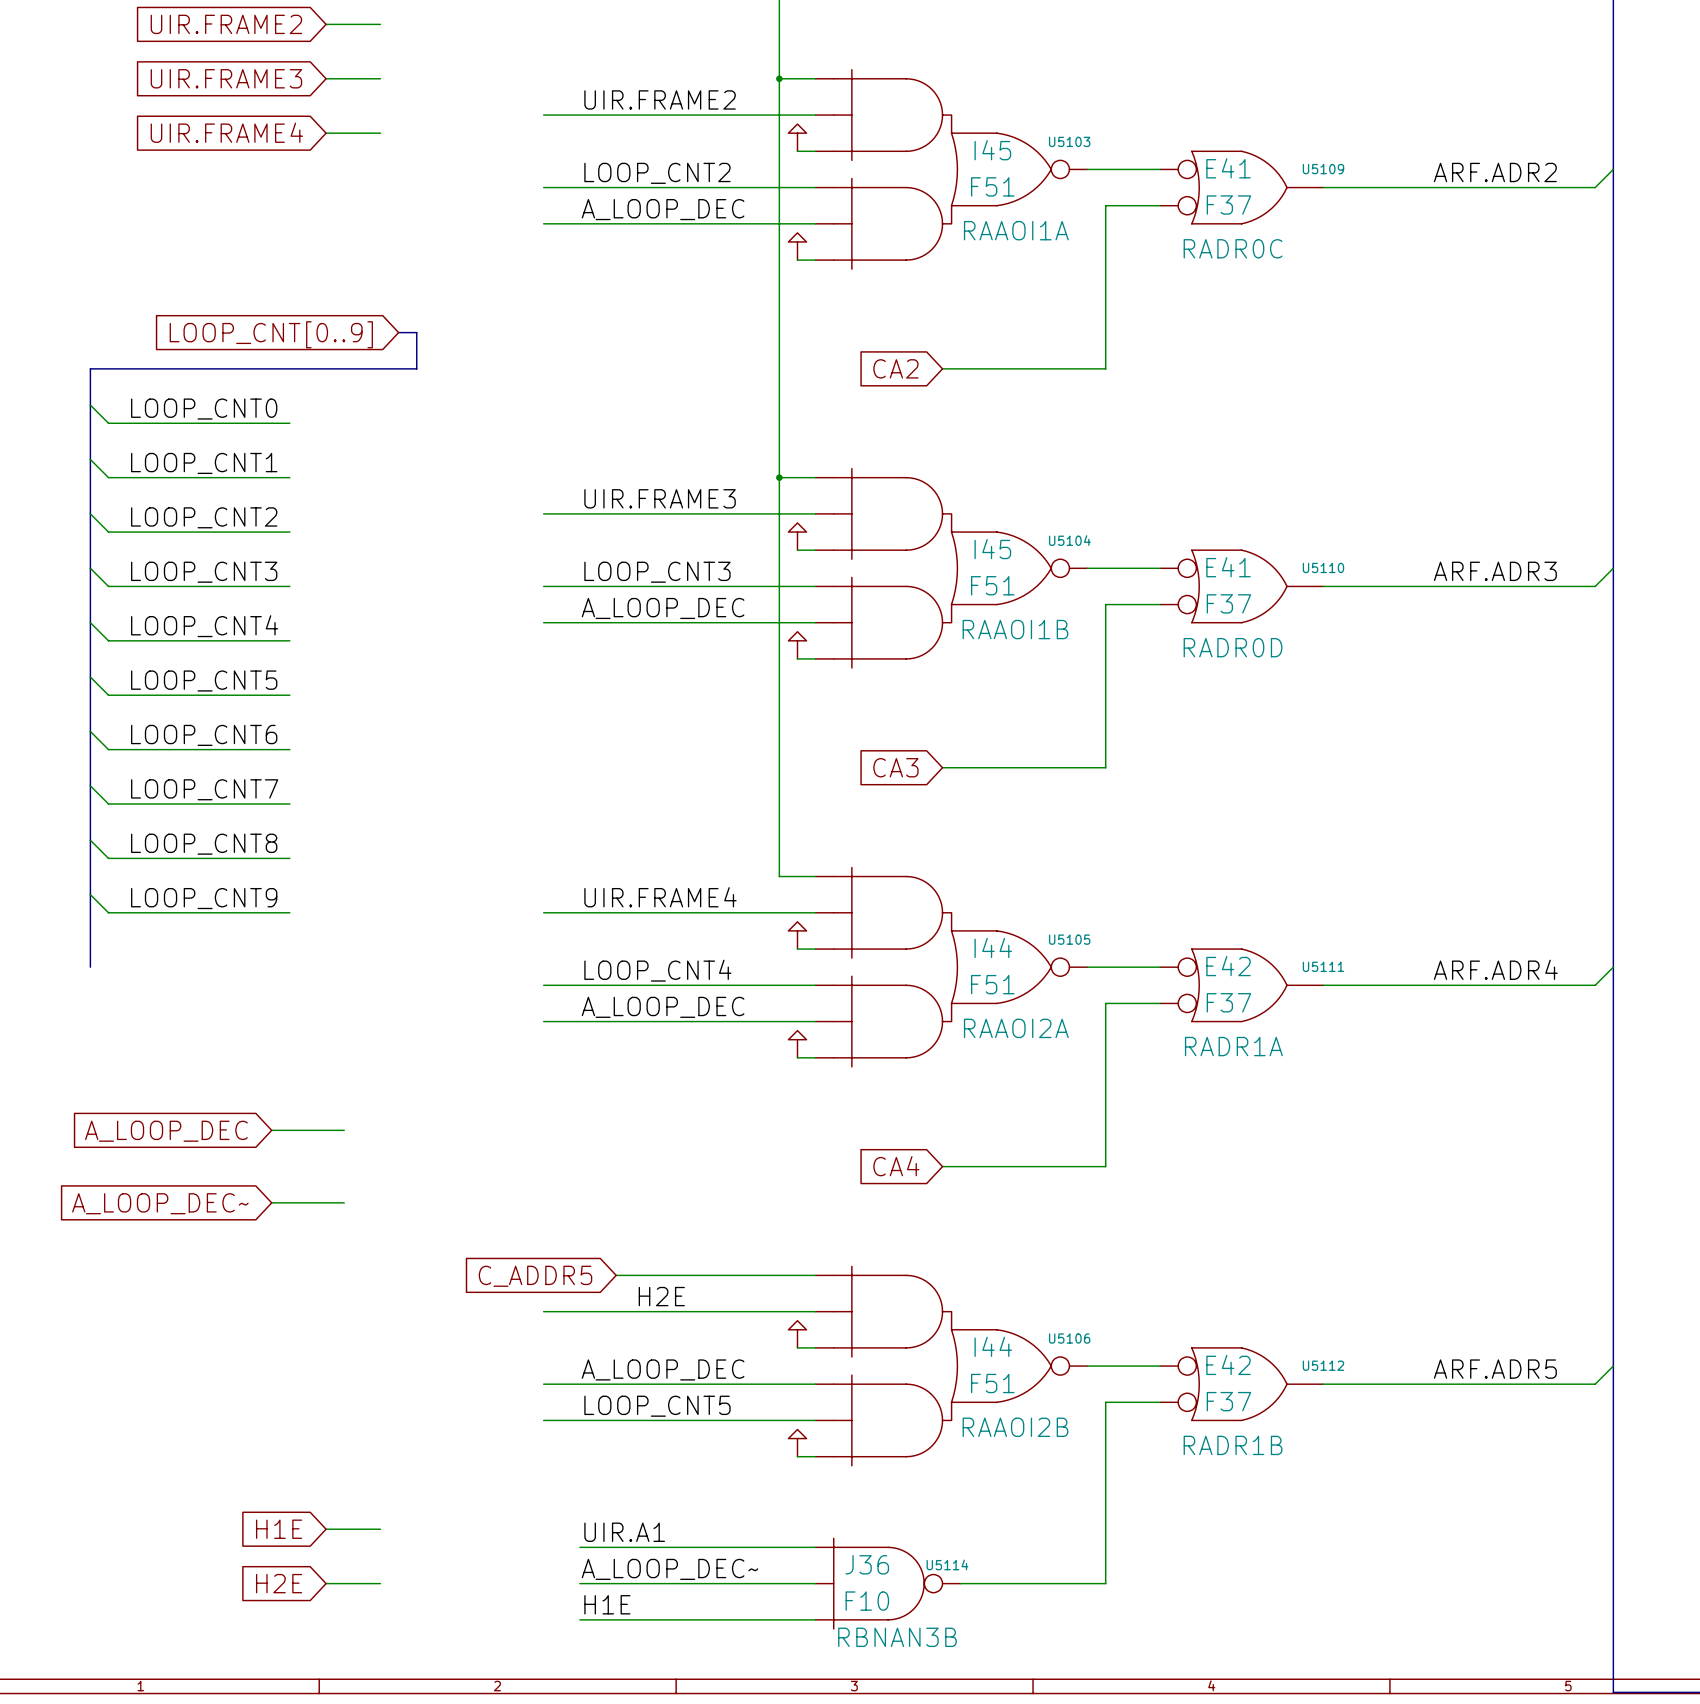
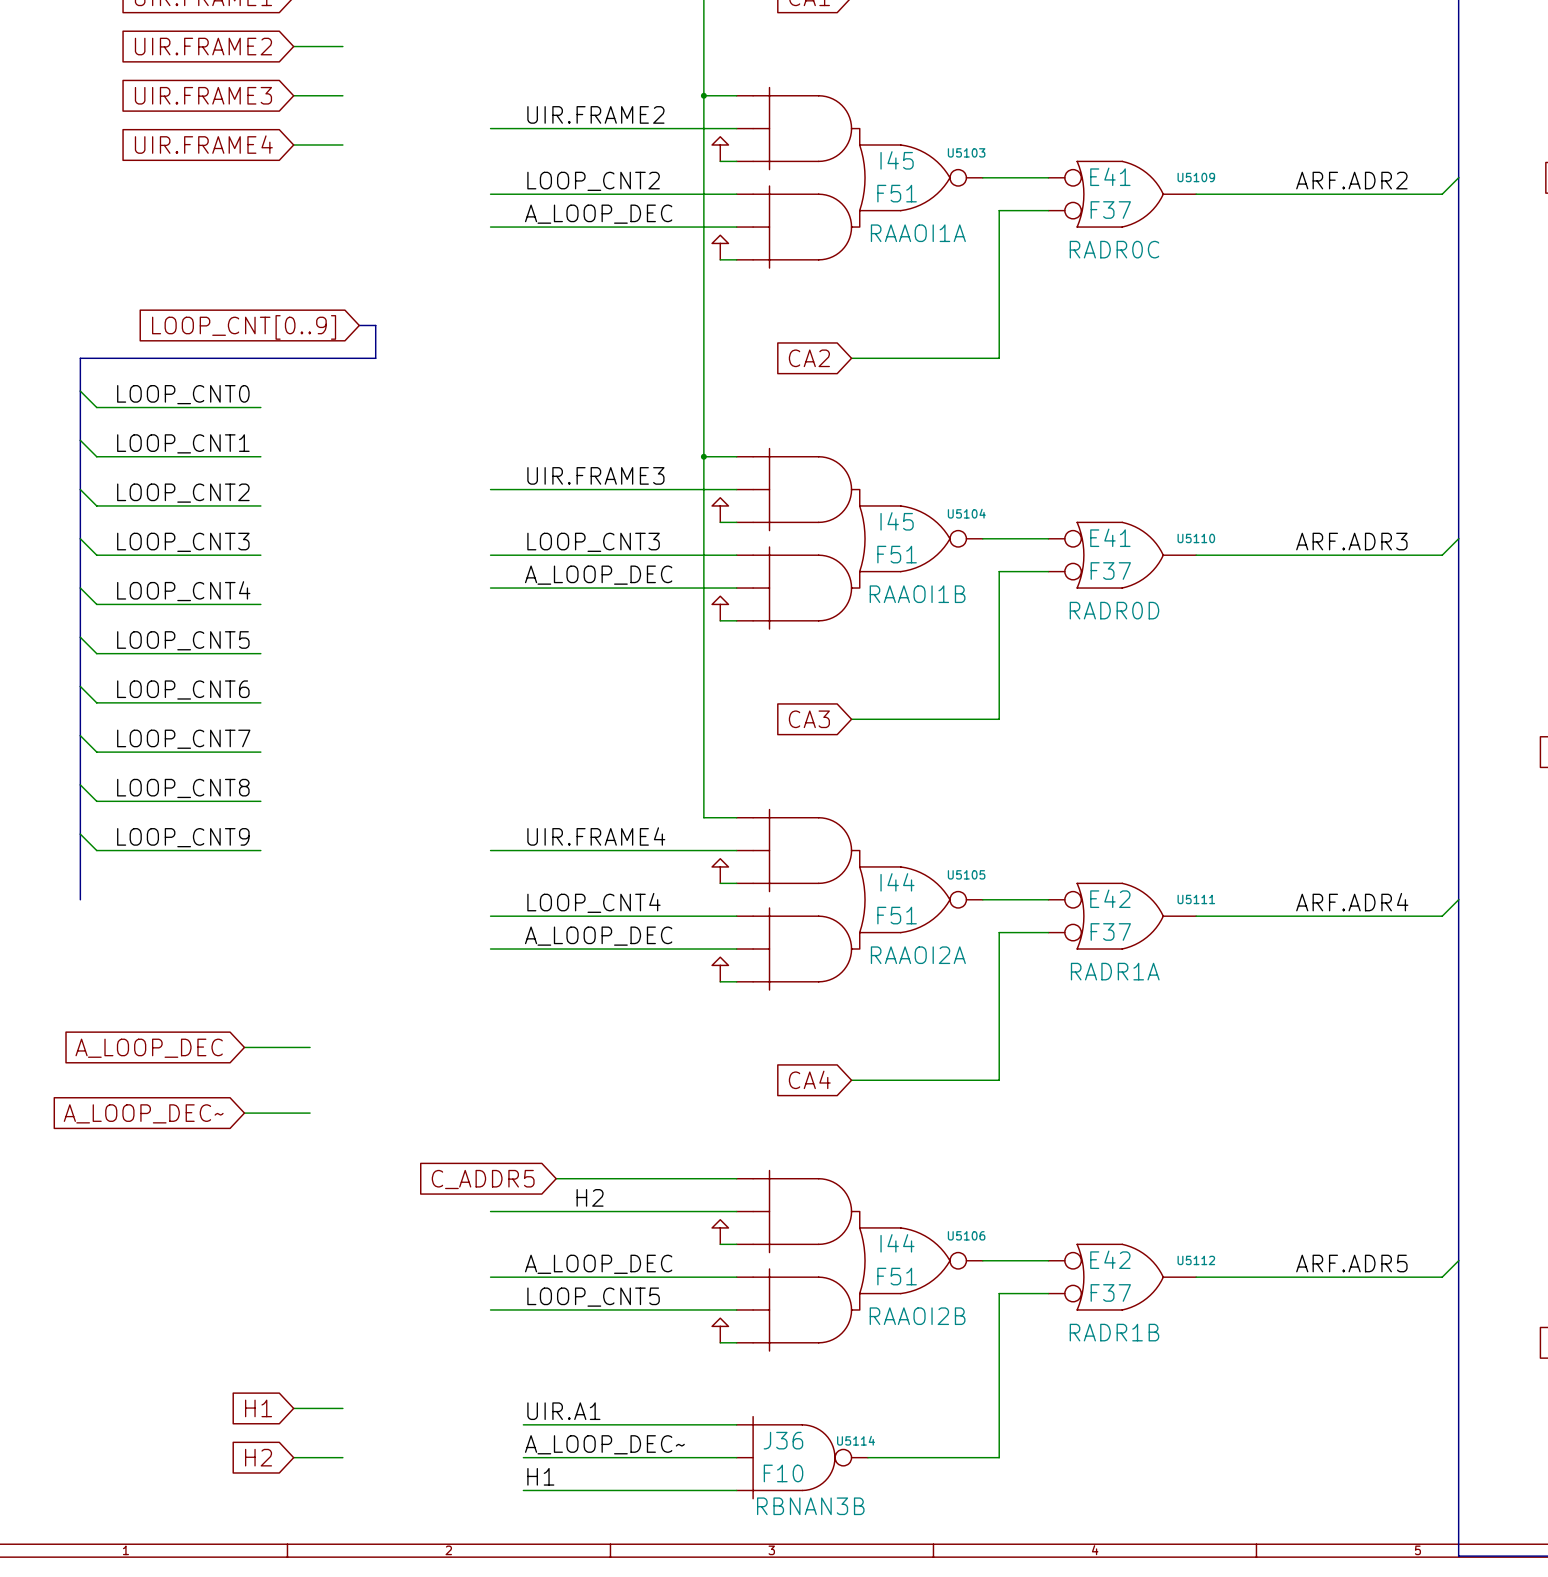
label: H2E (661, 1296) -> H2 (590, 1197)
global label: H1E (279, 1529) -> H1 (258, 1408)
global label: H2E (279, 1583) -> H2 (258, 1457)
label: H1E (607, 1604) -> H1 (540, 1476)

